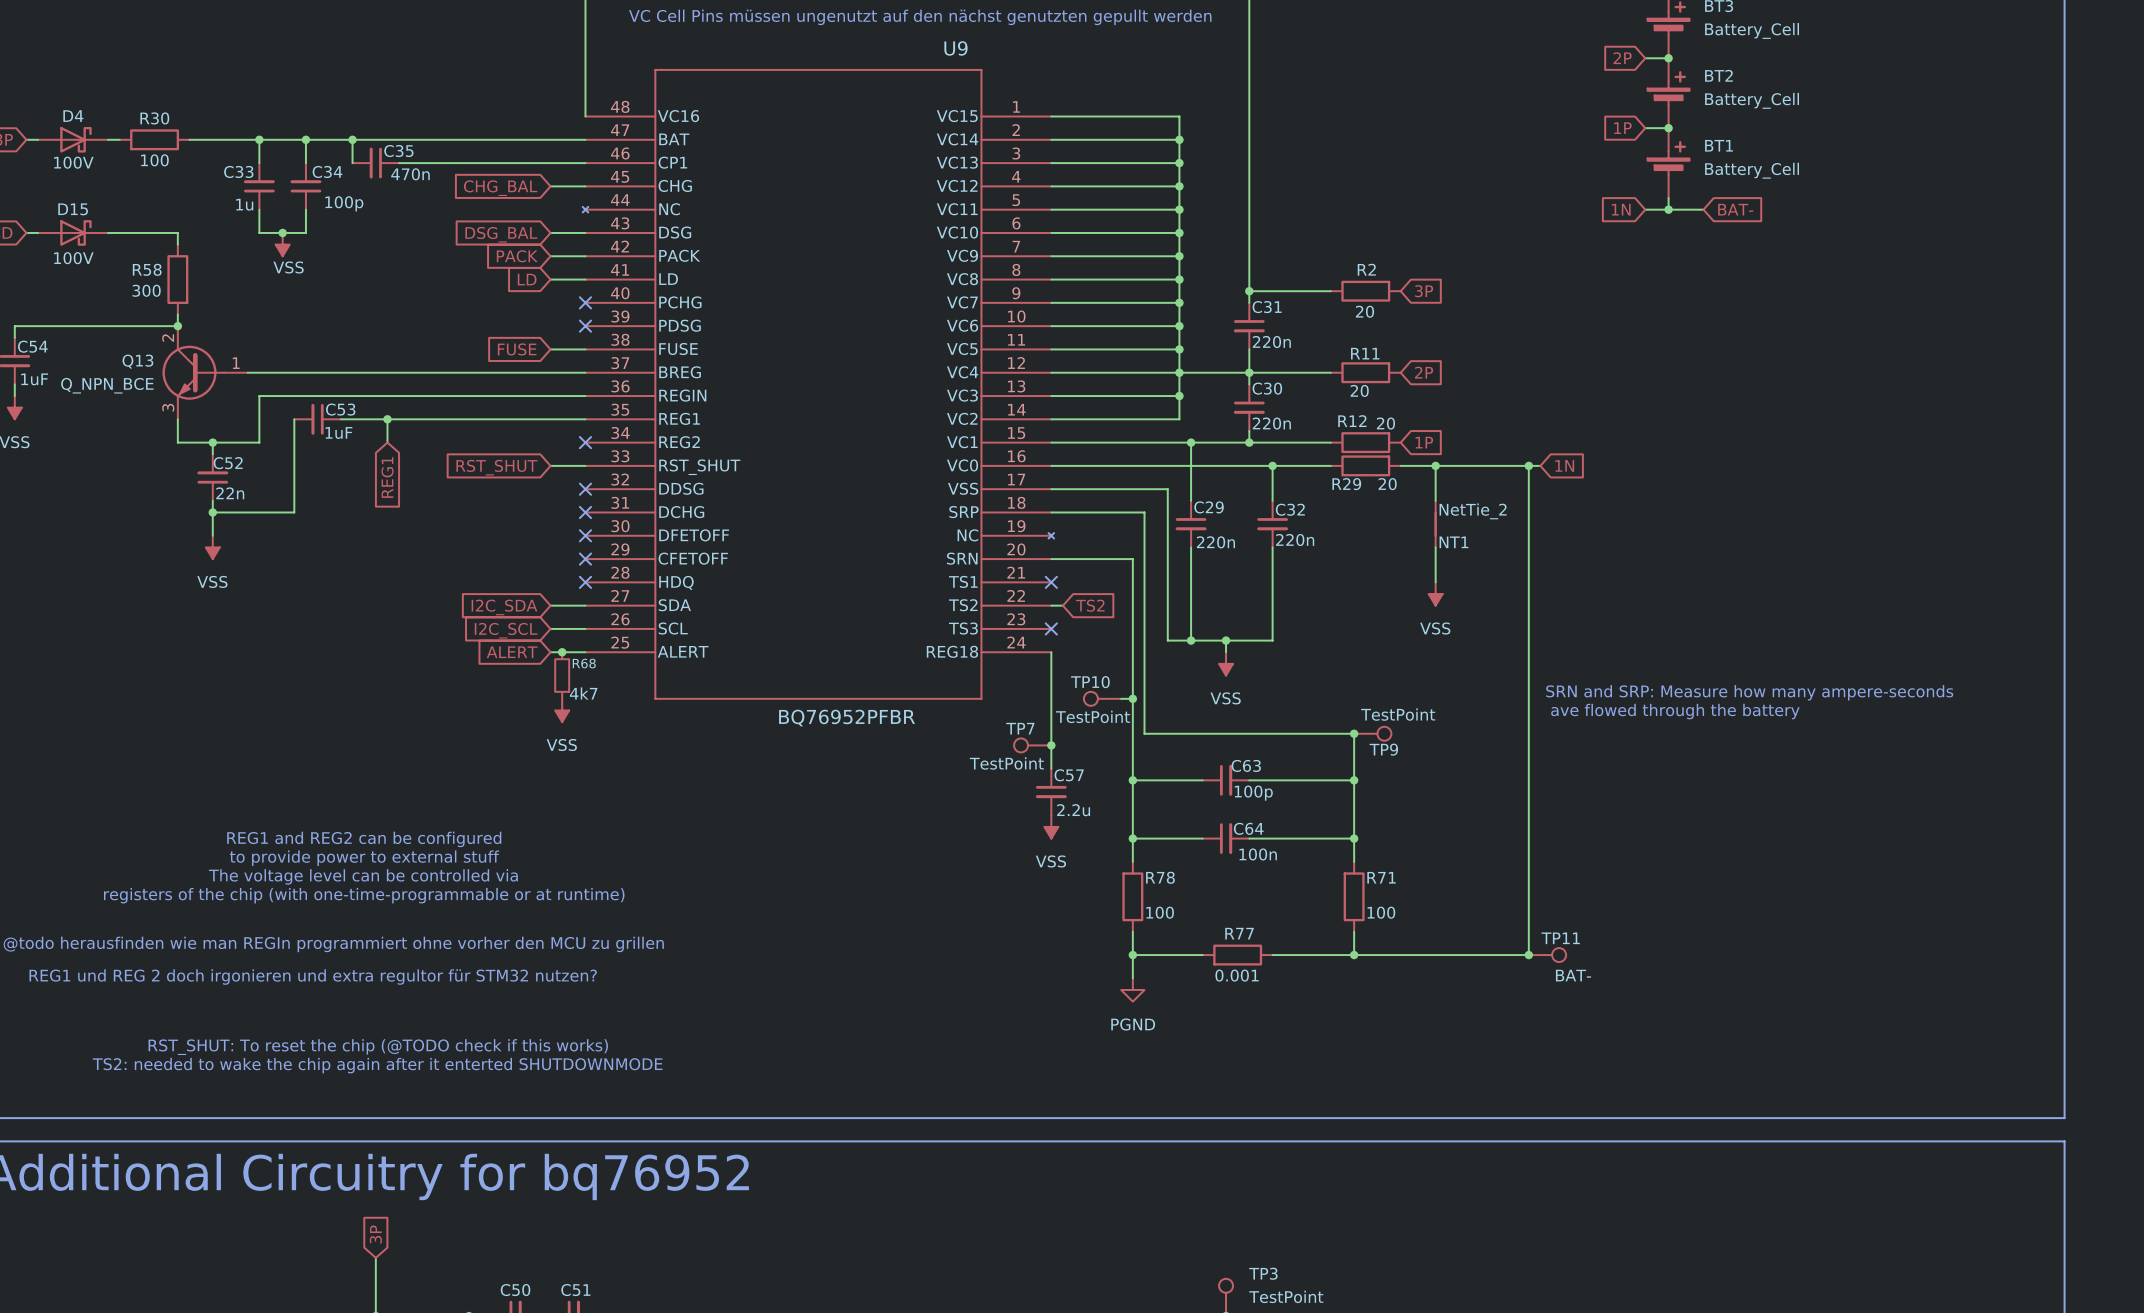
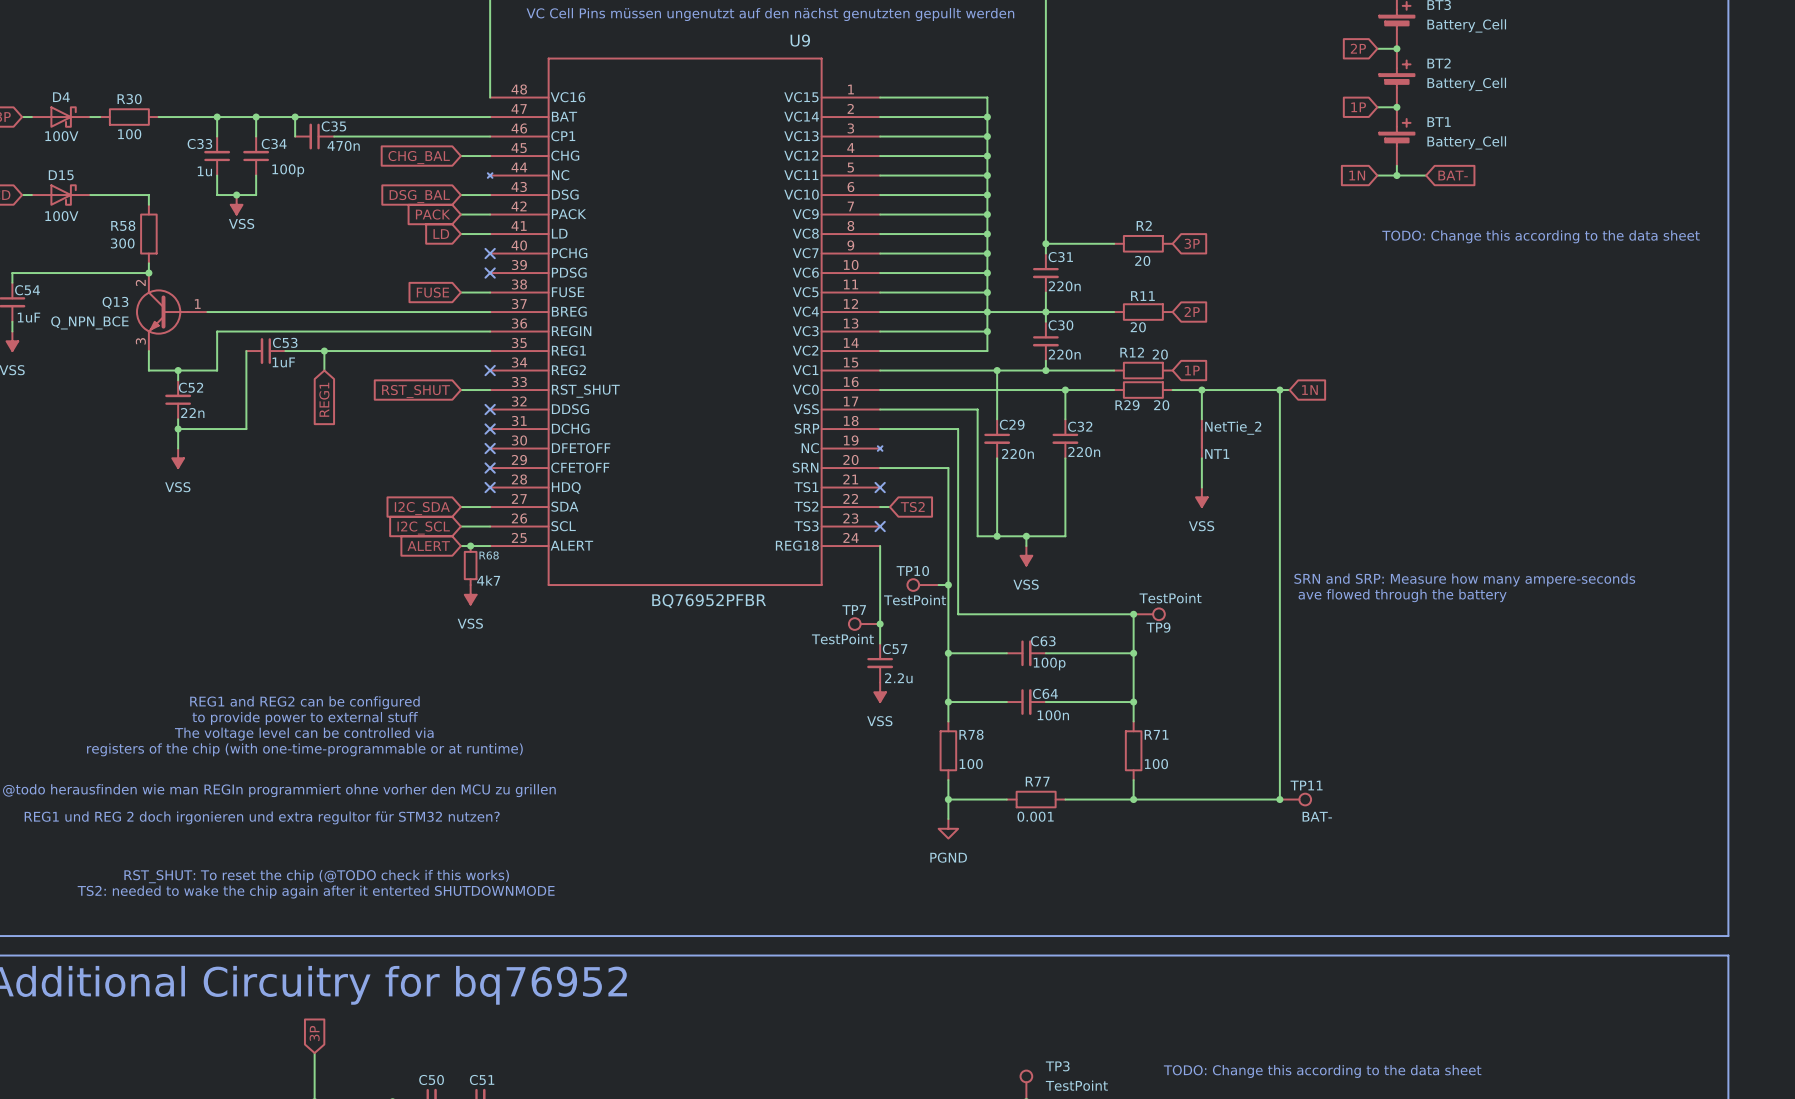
text: none -> TODO: Change this according to the data sheet (1541, 236)
text: none -> TODO: Change this according to the data sheet (1322, 1071)

